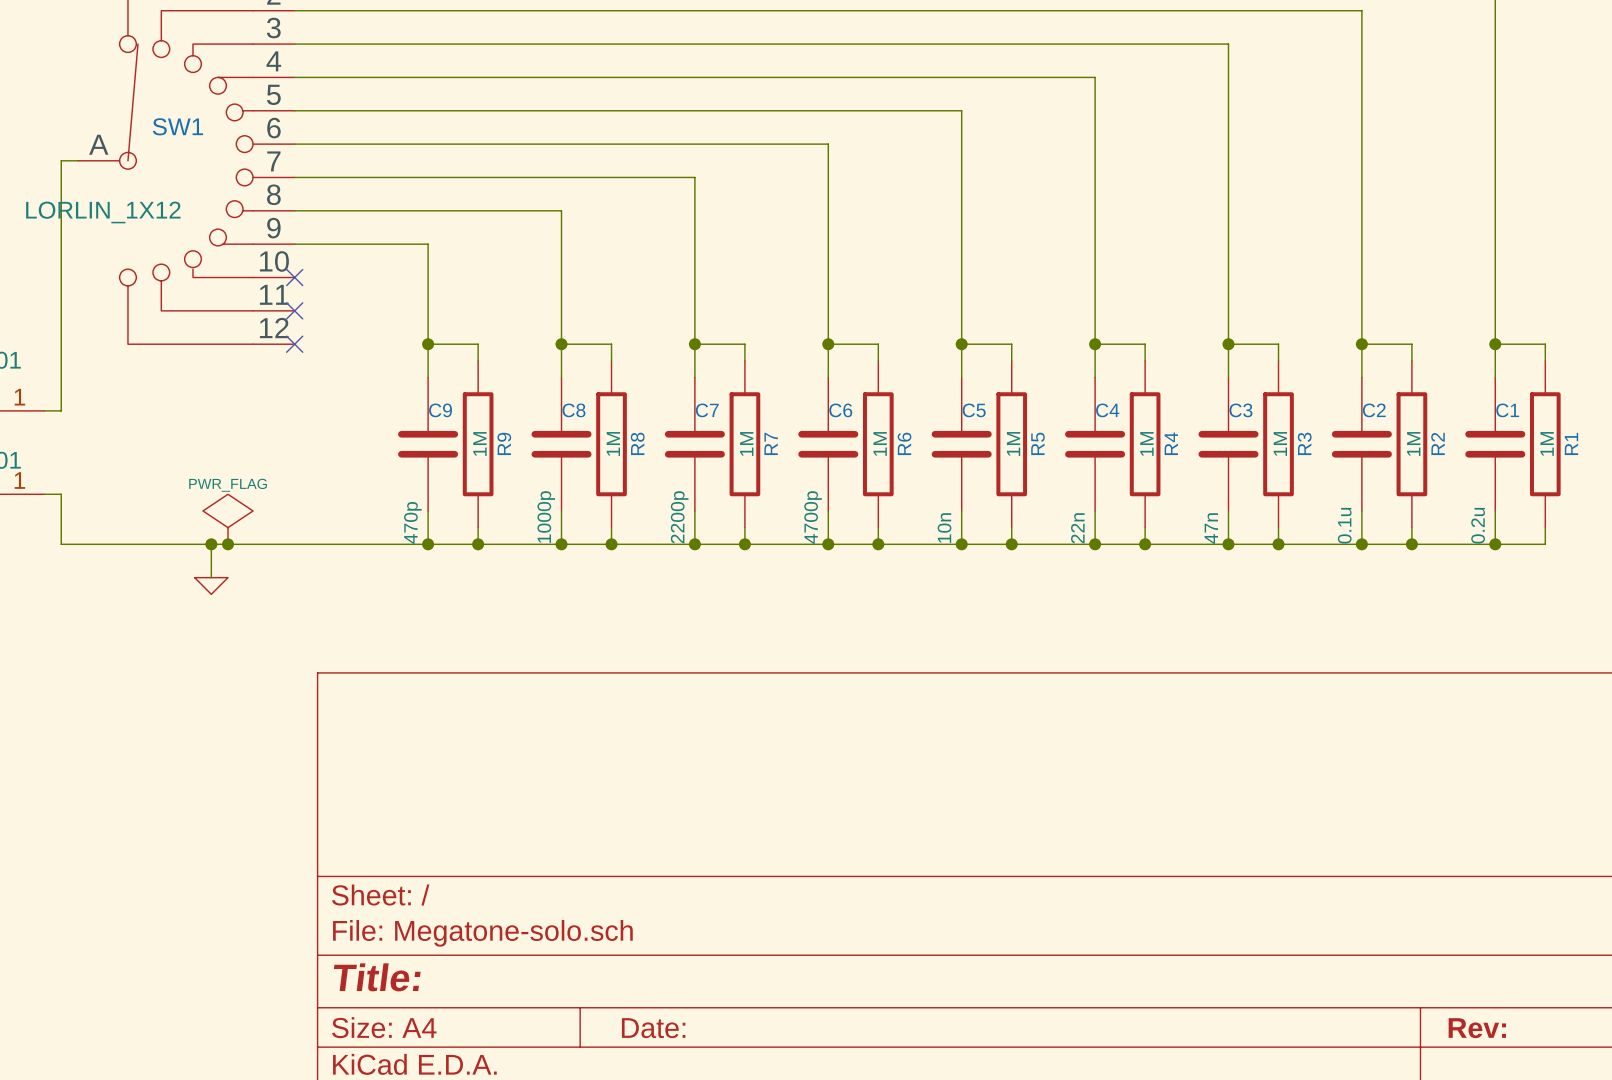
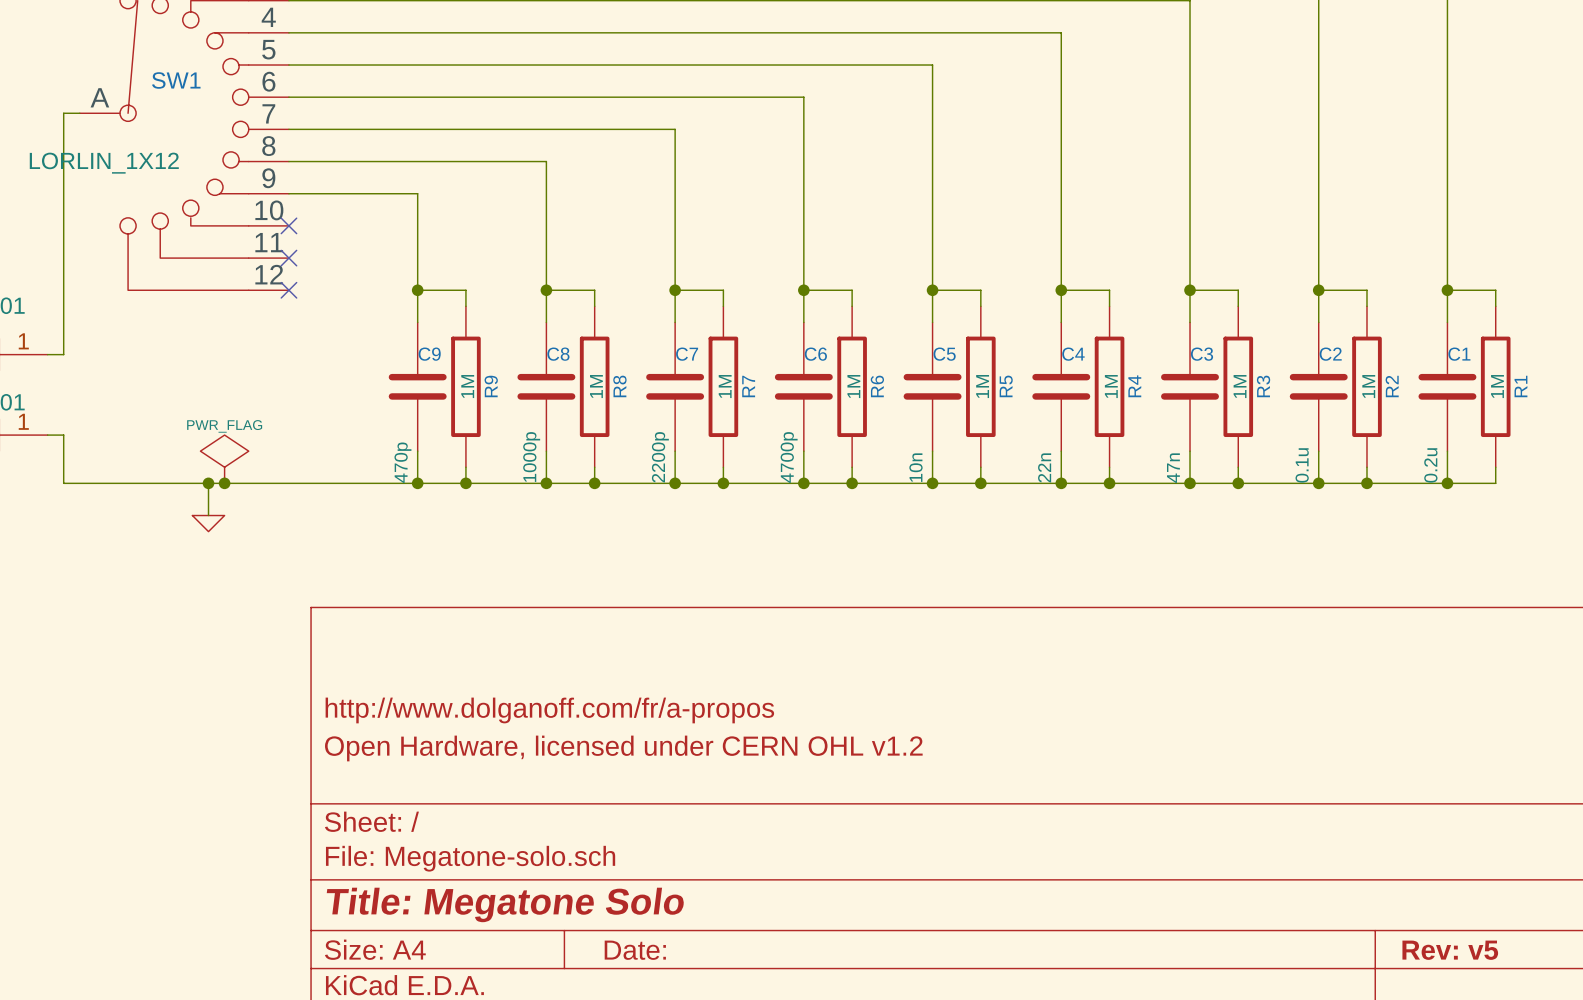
title block: none -> http://www.dolganoff.com/fr/a-propos (549, 710)
title block: none -> Open Hardware, licensed under CERN OHL v1.2 (623, 748)
title block: Title: (377, 977) -> Title: Megatone Solo (505, 904)
title block: Rev: (1477, 1028) -> Rev: v5 (1450, 950)

